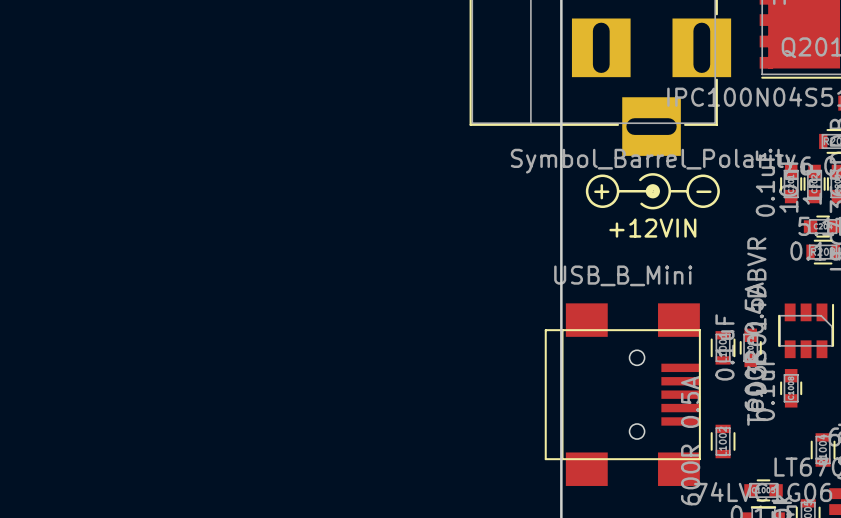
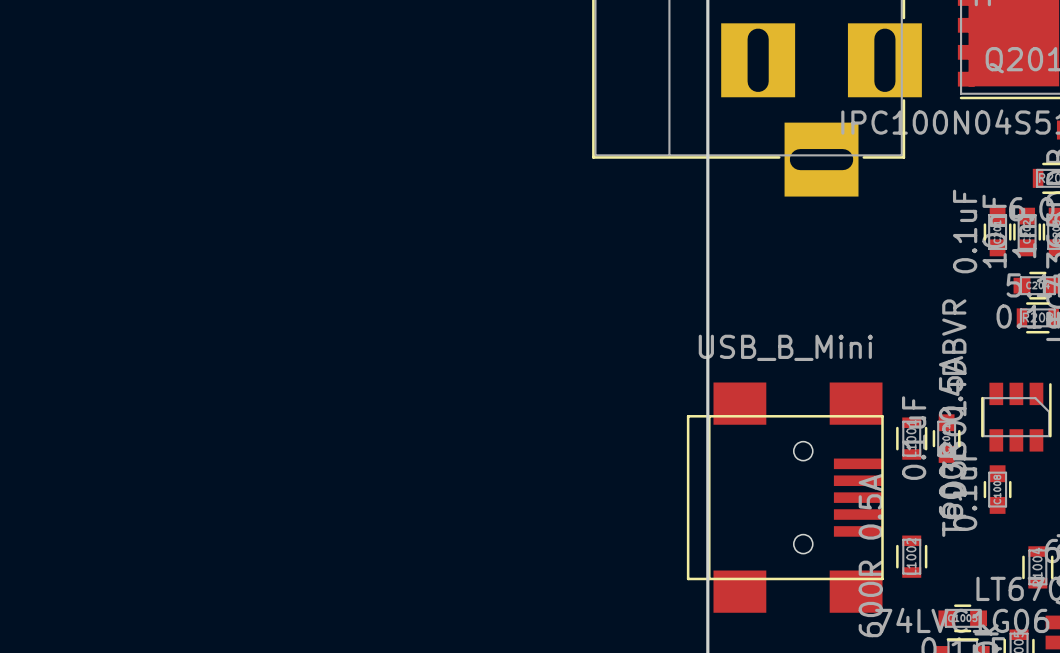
drawing: [585, 173, 720, 210] -> none
text: + (601, 191) -> none
text: - (703, 191) -> none
text: +12VIN (652, 228) -> none

